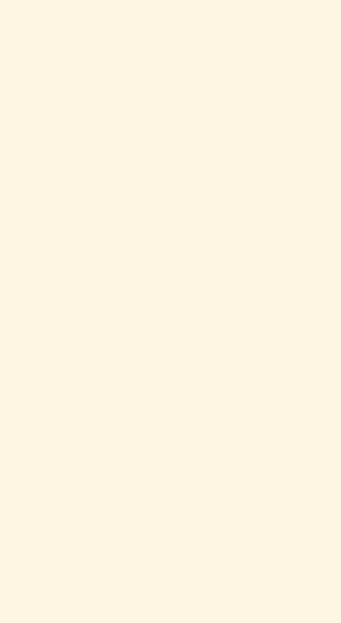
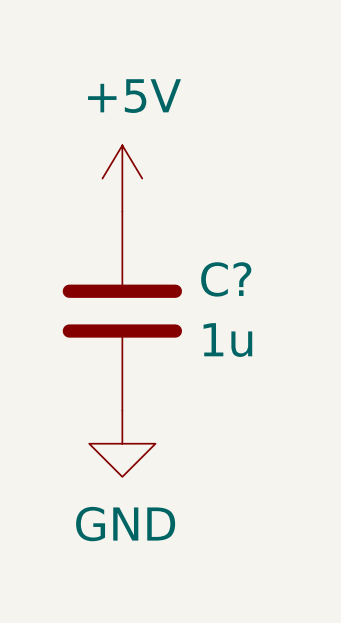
power symbol: none -> +5V (122, 178)
C?: none -> 1u (122, 311)
power symbol: none -> GND (122, 443)

